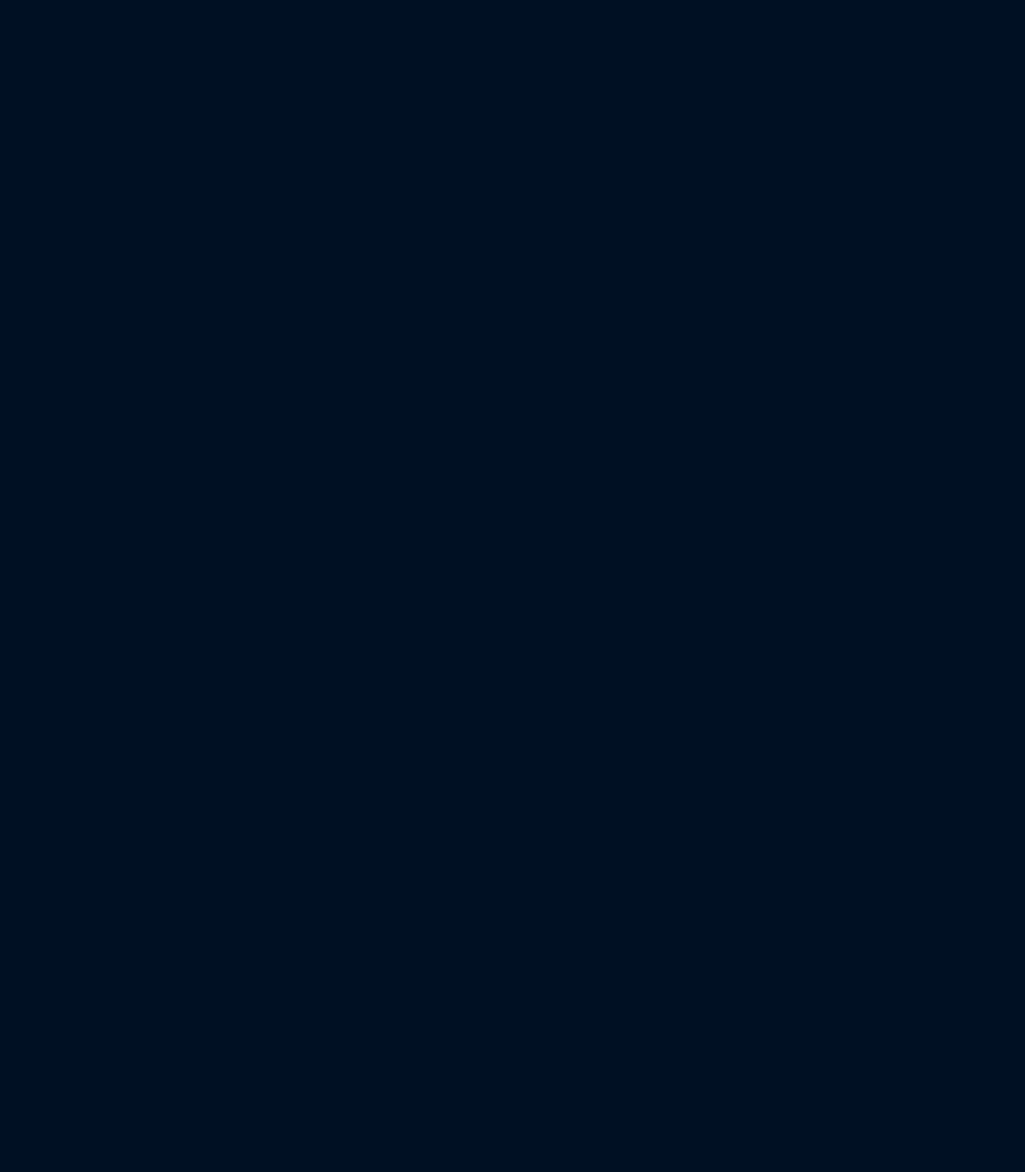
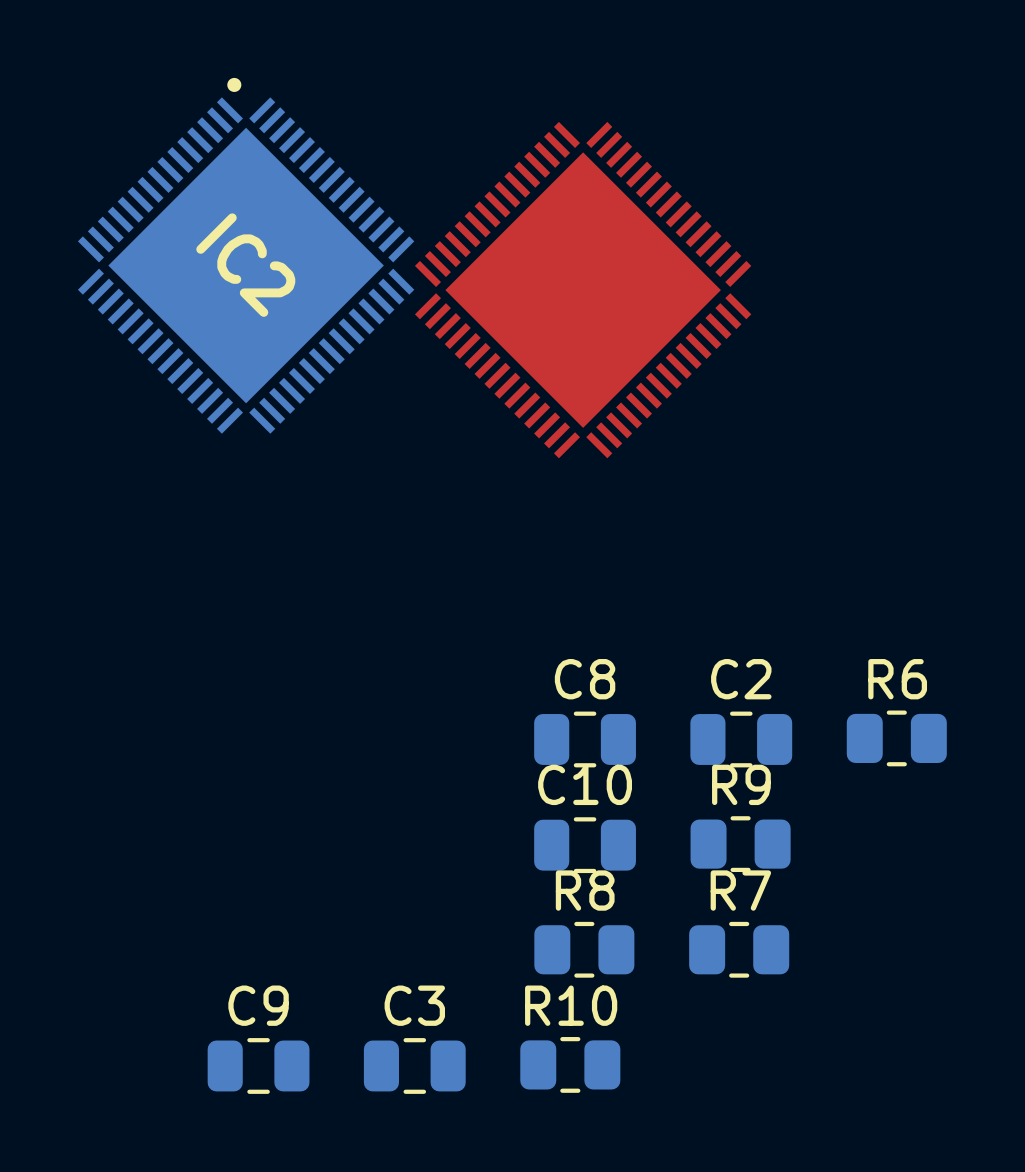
IC2: none -> (246, 255)
part: none -> (583, 290)
R6: none -> (896, 738)
C8: none -> (585, 739)
C2: none -> (741, 739)
R9: none -> (740, 844)
C10: none -> (585, 845)
R8: none -> (584, 949)
R7: none -> (739, 949)
R10: none -> (570, 1064)
C9: none -> (258, 1065)
C3: none -> (414, 1065)

